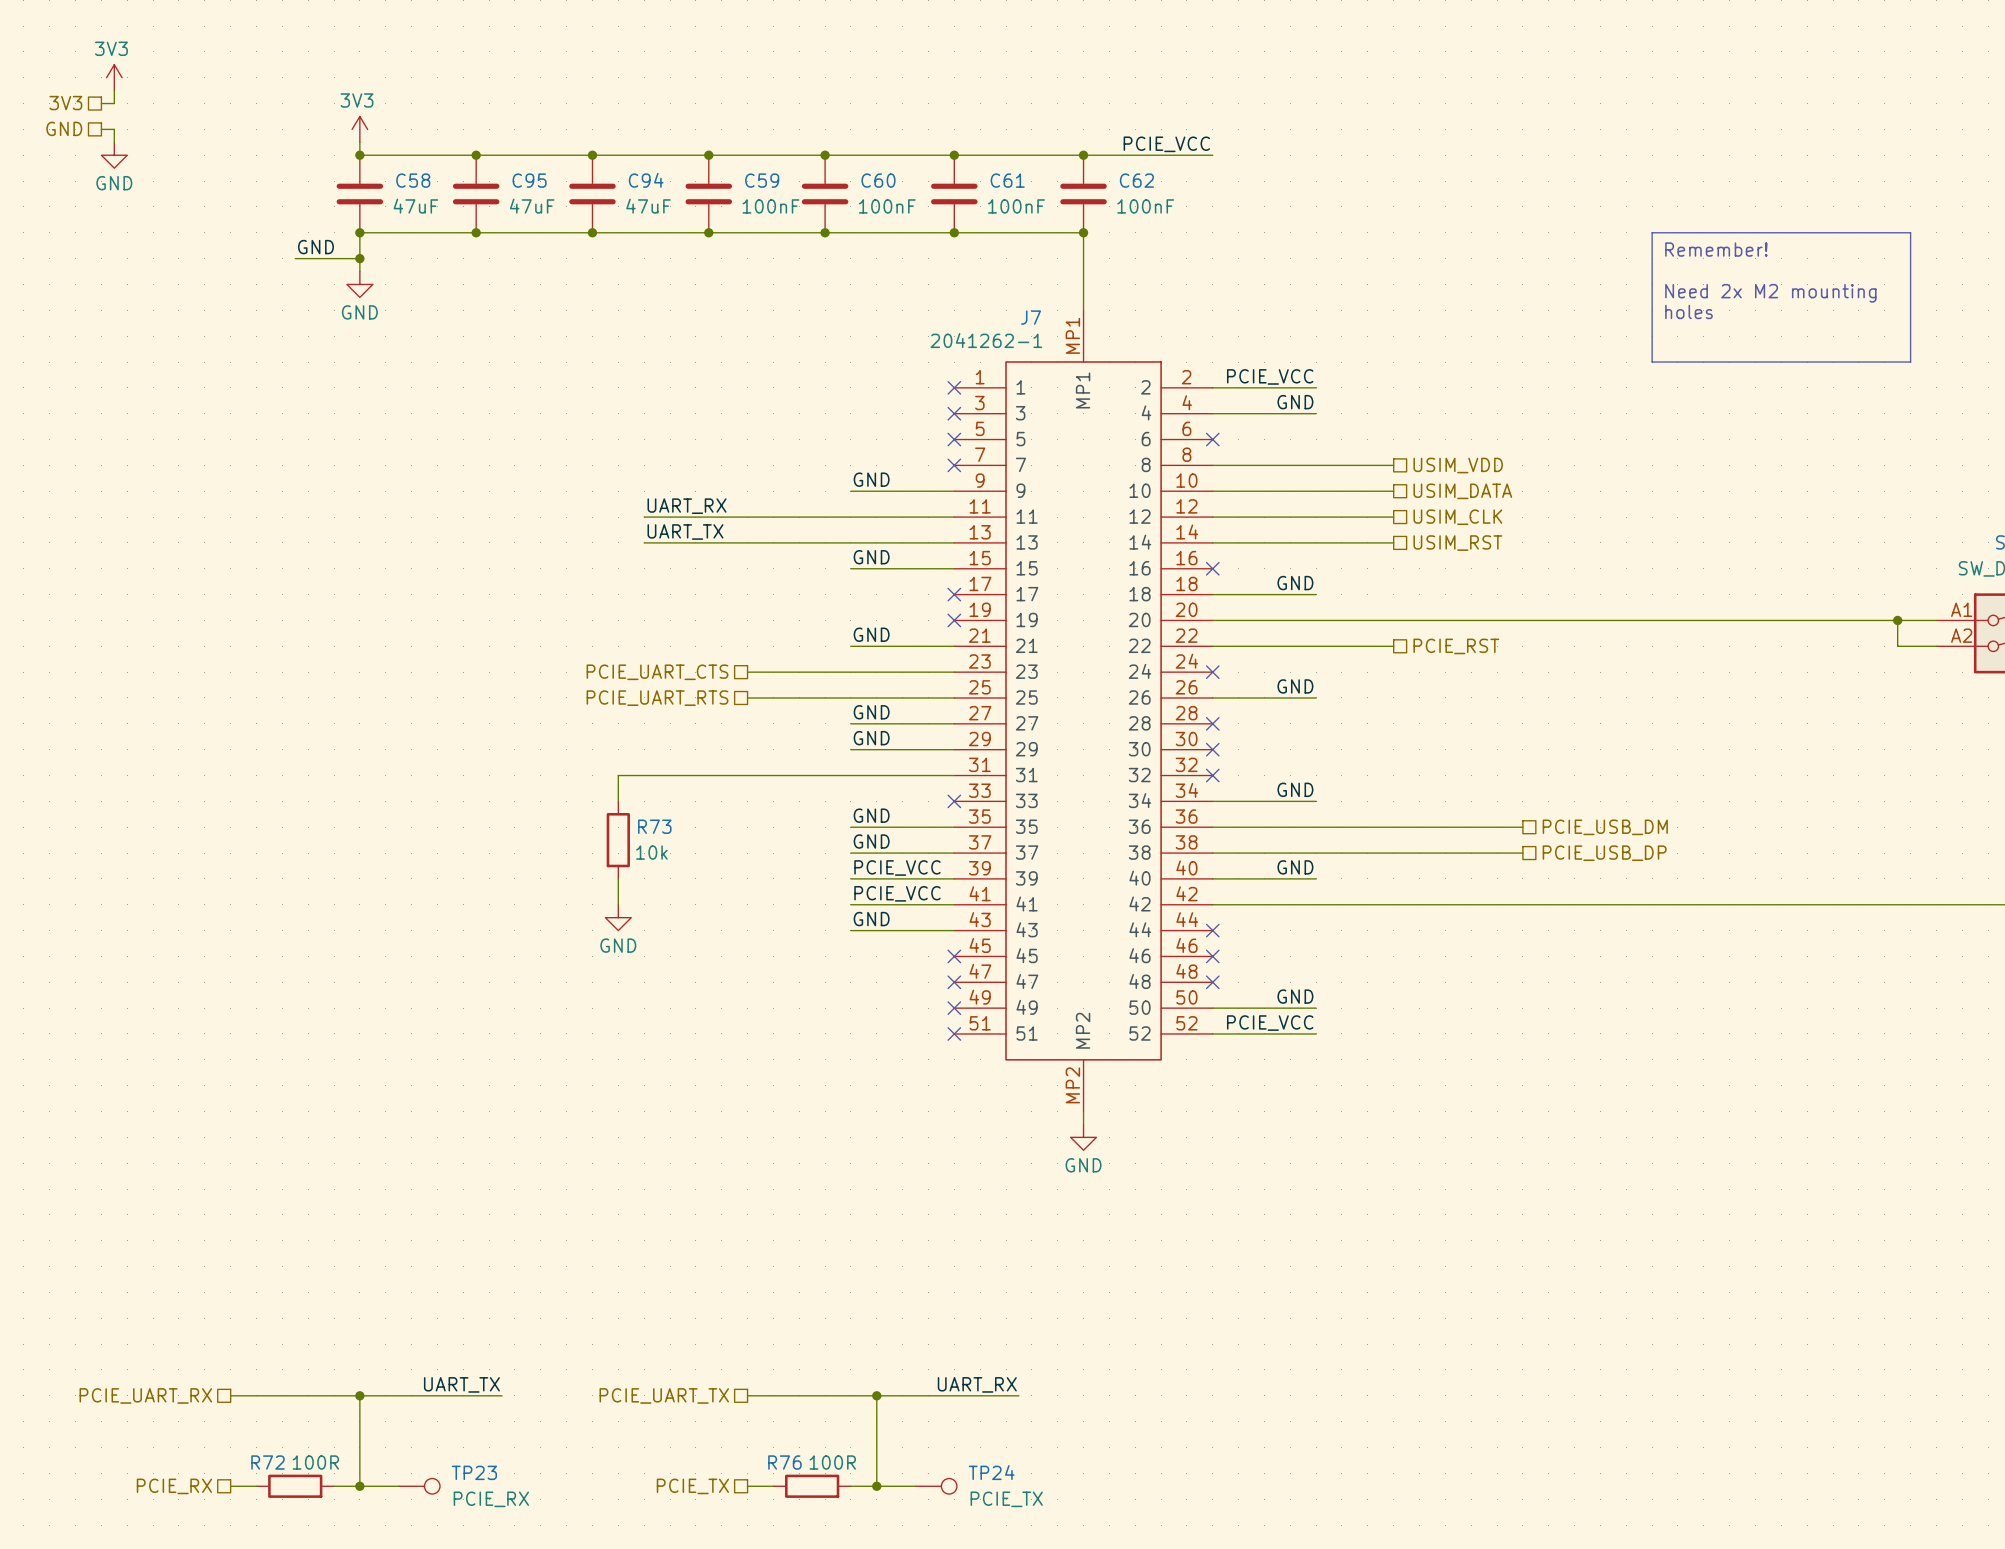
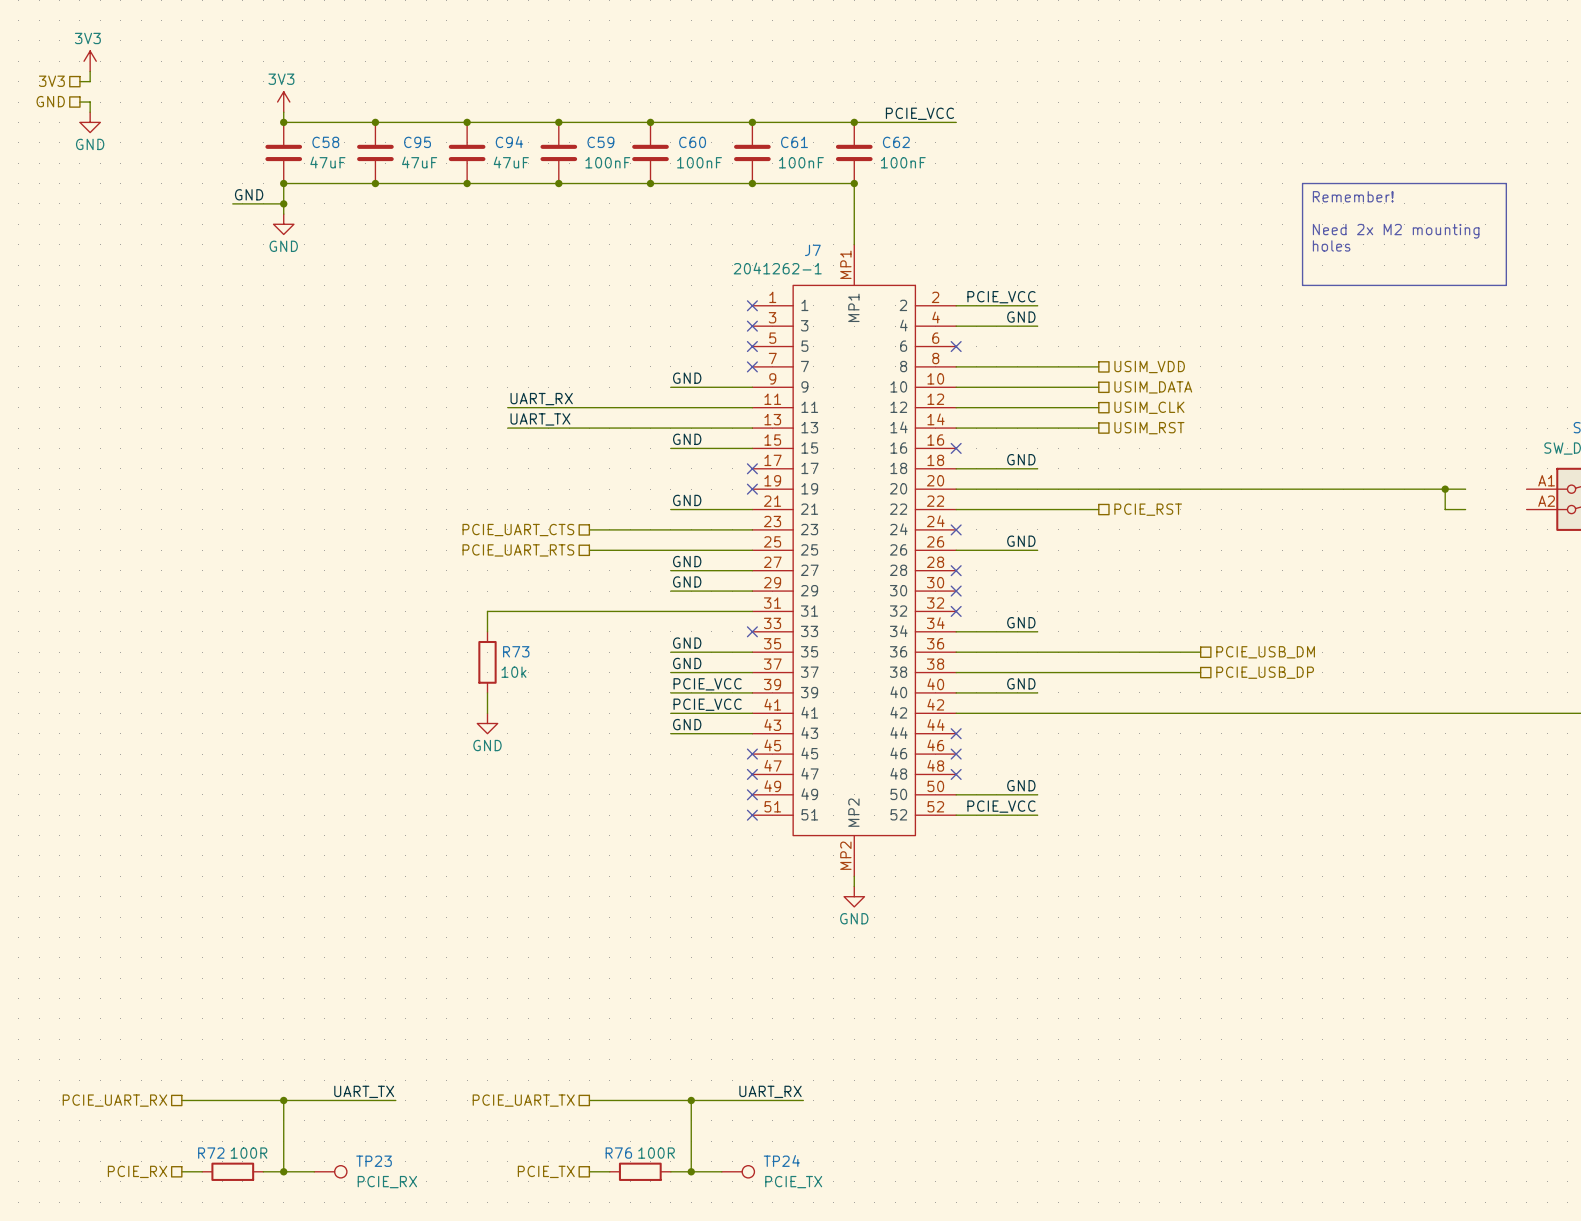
wire: none -> (1445, 489) (1445, 509) (1465, 509)
junction: none -> (1445, 489)
wire: (1858, 620) (1936, 620) -> none
wire: (1897, 620) (1897, 646) (1936, 646) -> none
junction: (1897, 620) -> none

